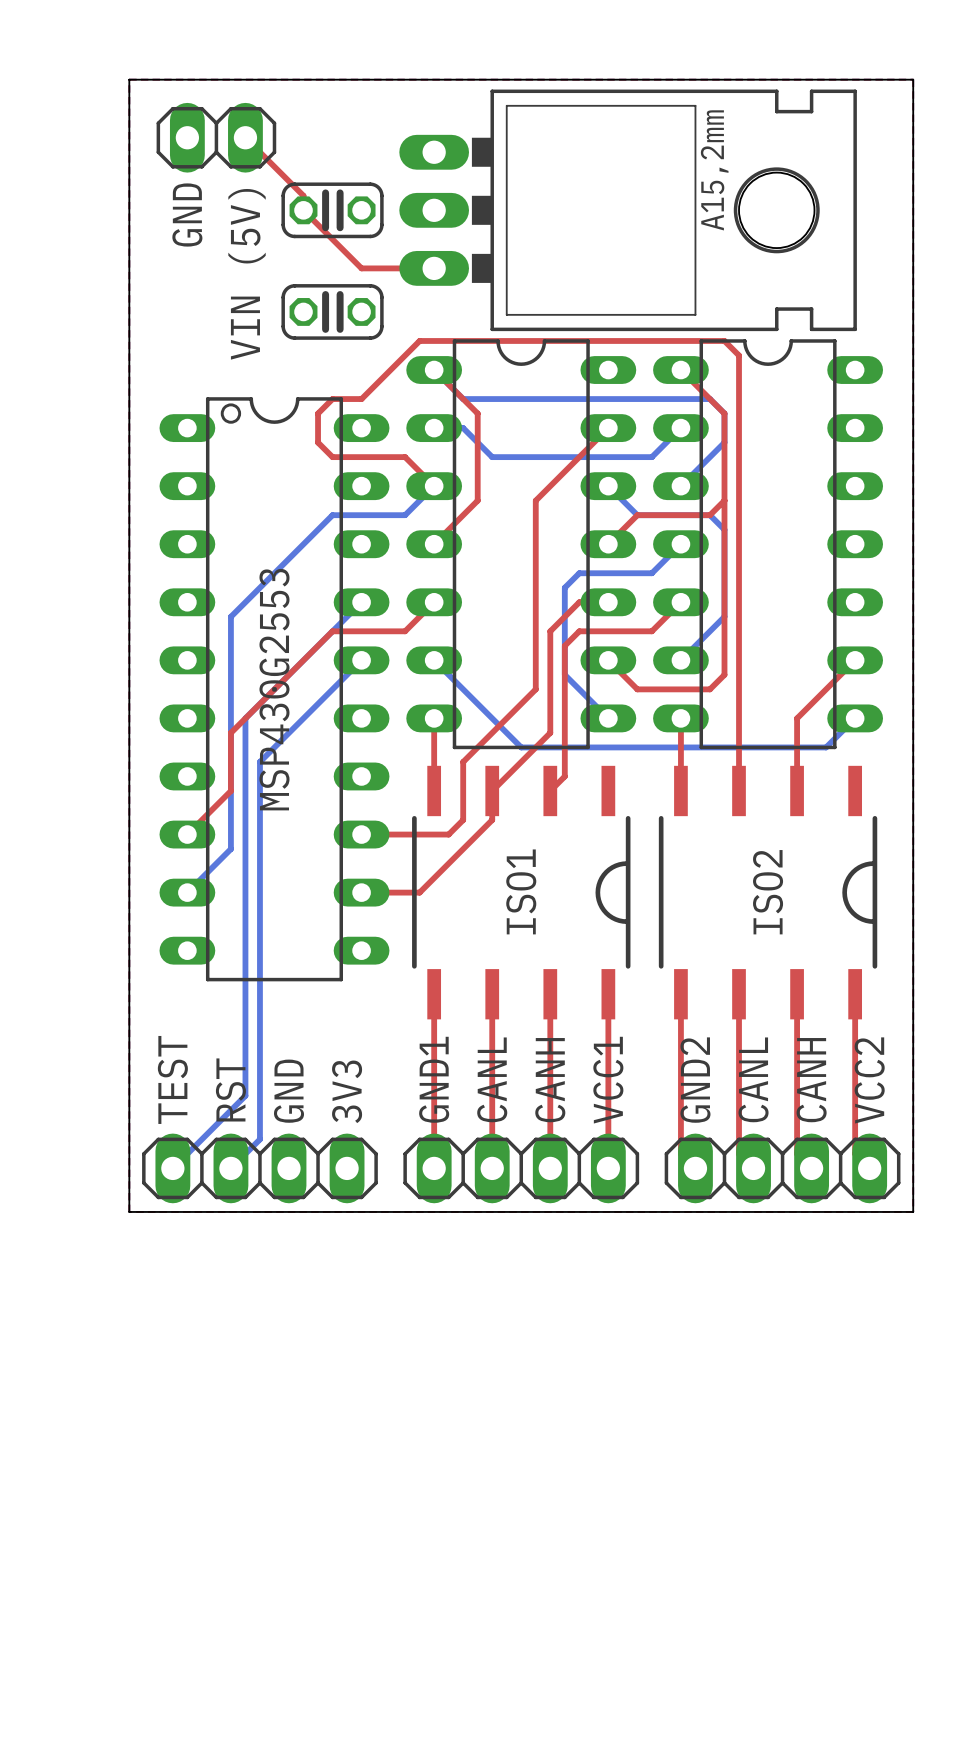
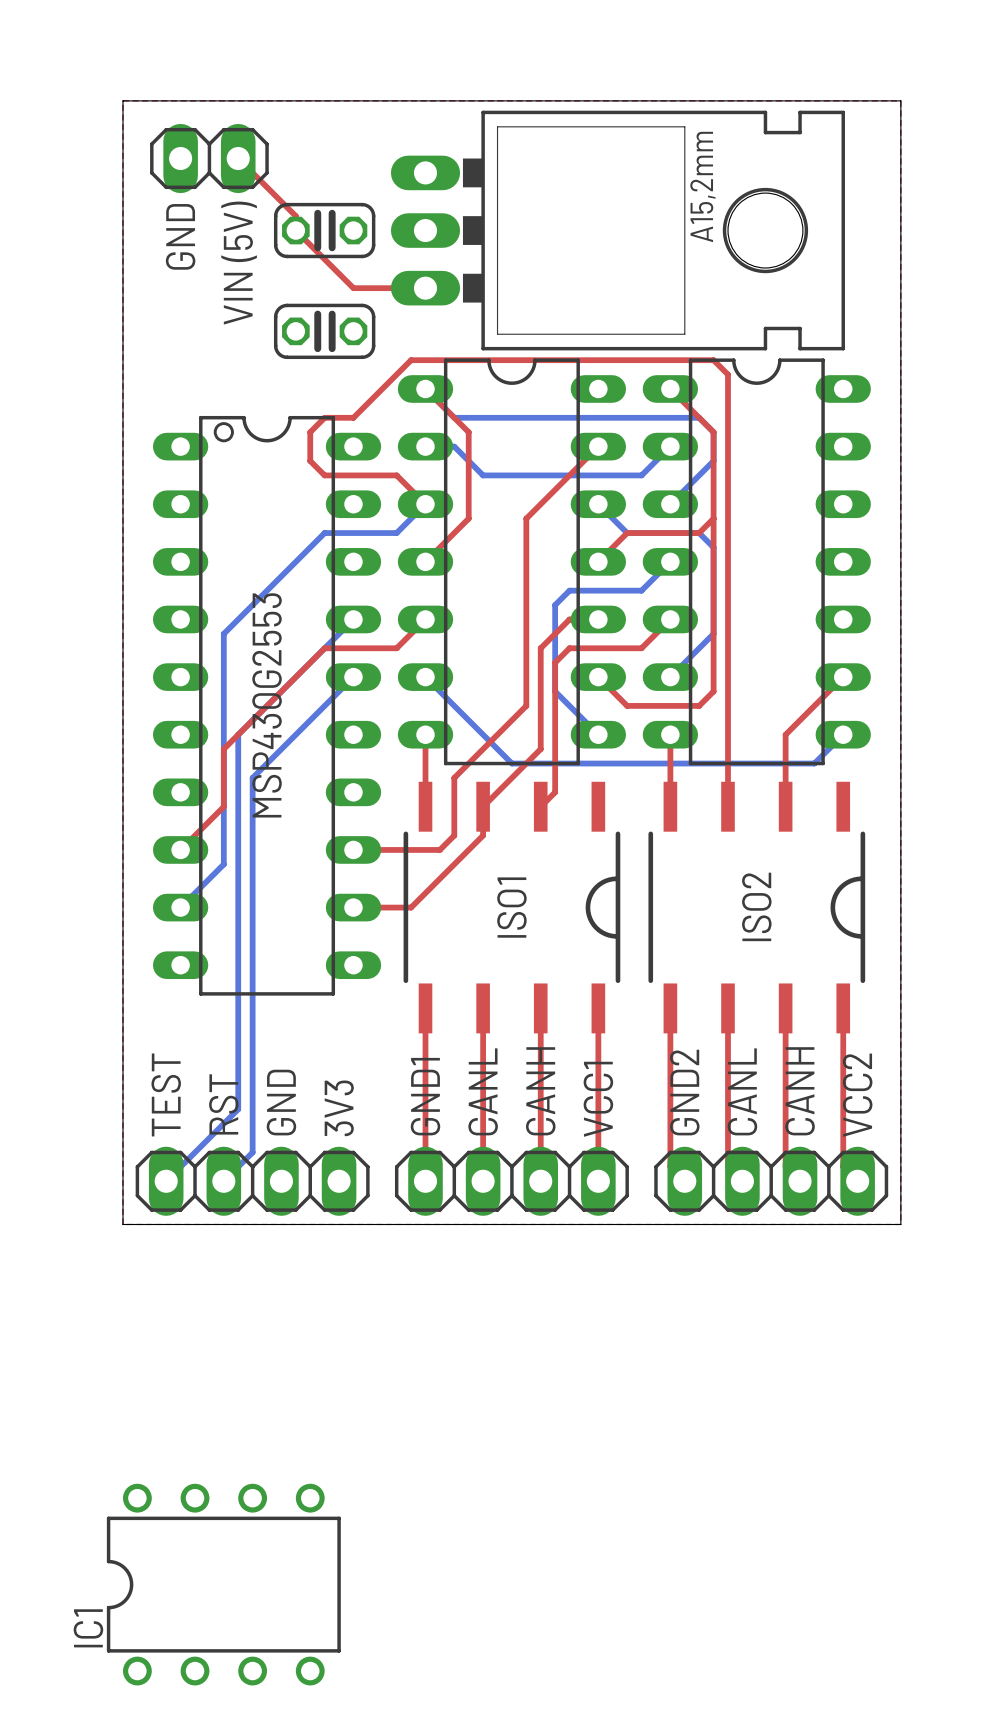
IC1: none -> (223, 1584)

